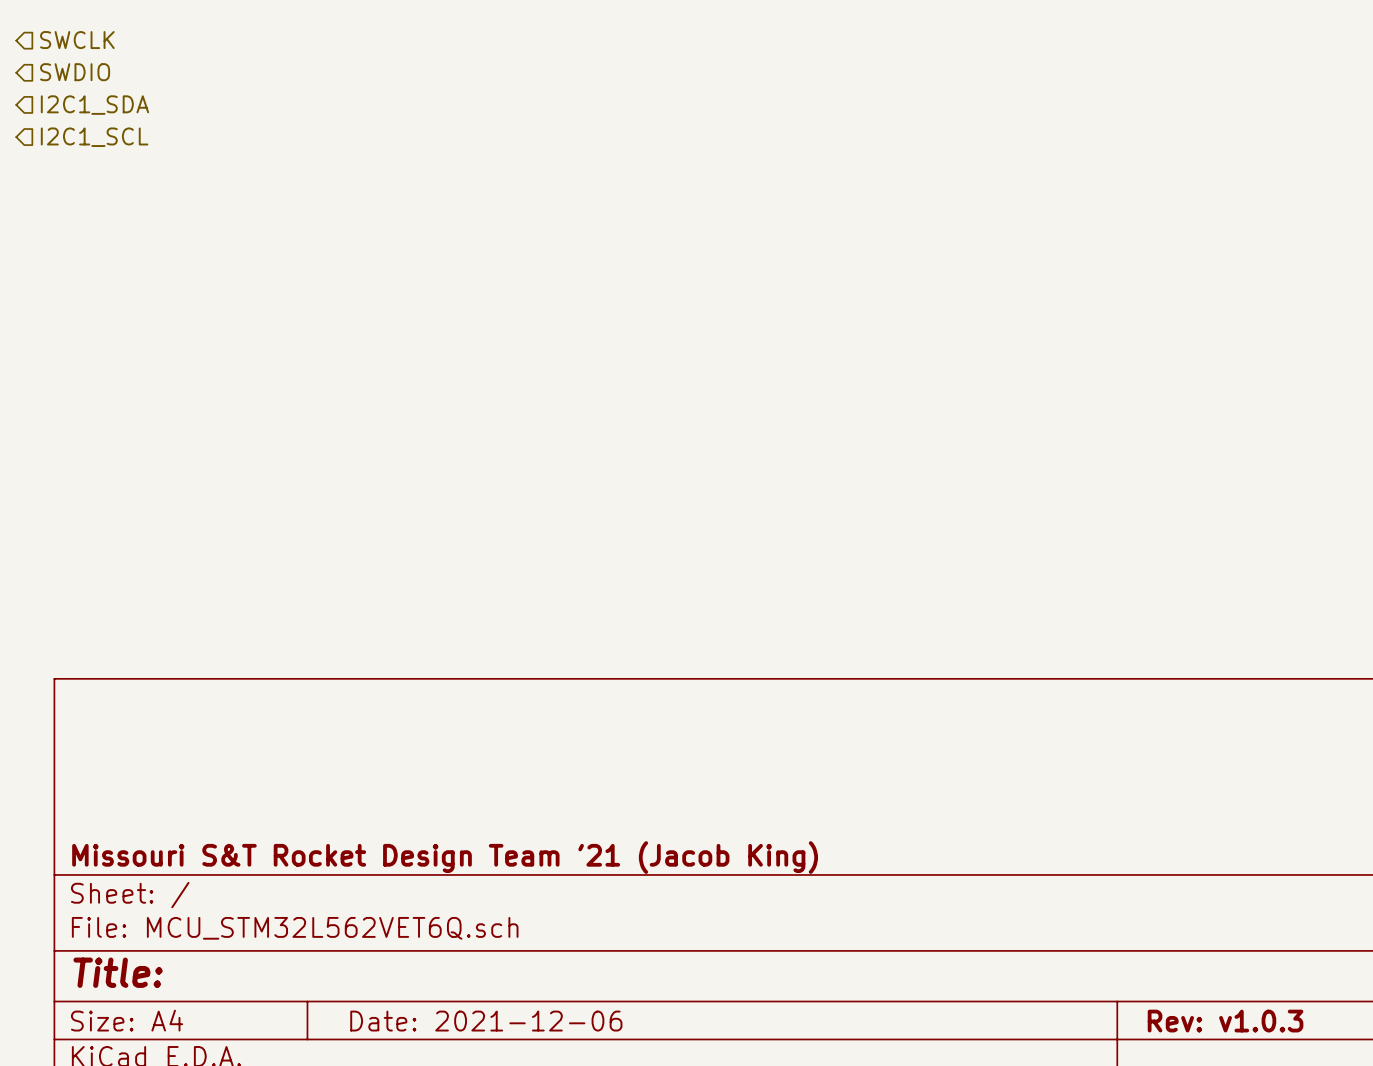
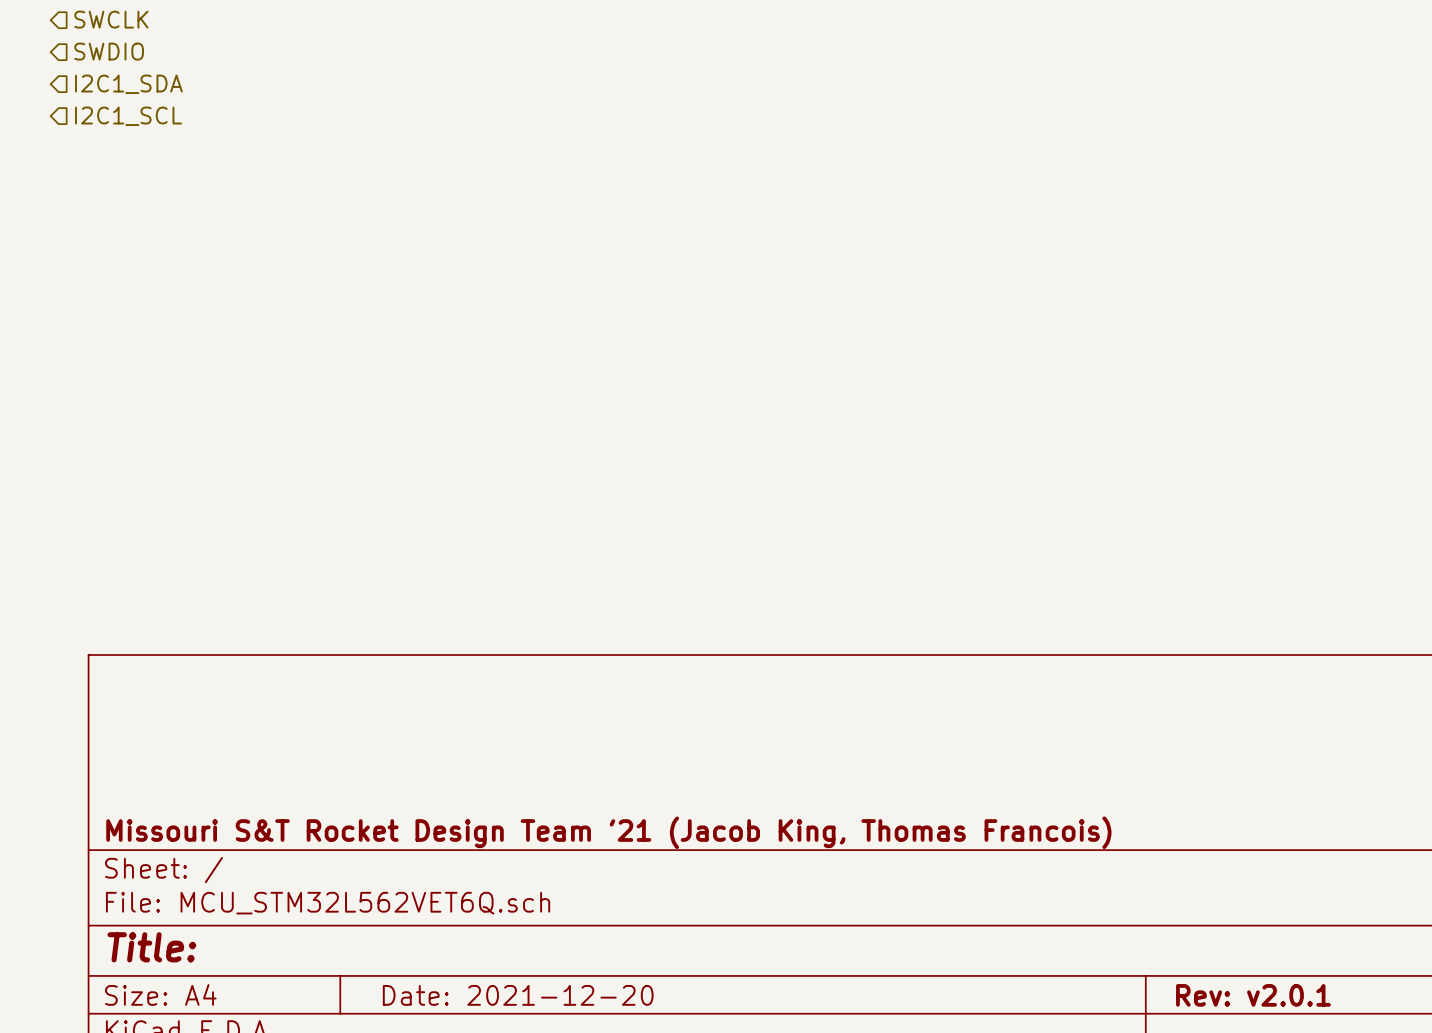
title block: Missouri S&T Rocket Design Team '21 (Jacob King) (445, 857) -> Missouri S&T Rocket Design Team '21 (Jacob King, Thomas Francois) (608, 832)
title block: Date: 2021-12-06 (486, 1021) -> Date: 2021-12-20 (518, 995)
title block: Rev: v1.0.3 (1225, 1021) -> Rev: v2.0.1 (1253, 995)

